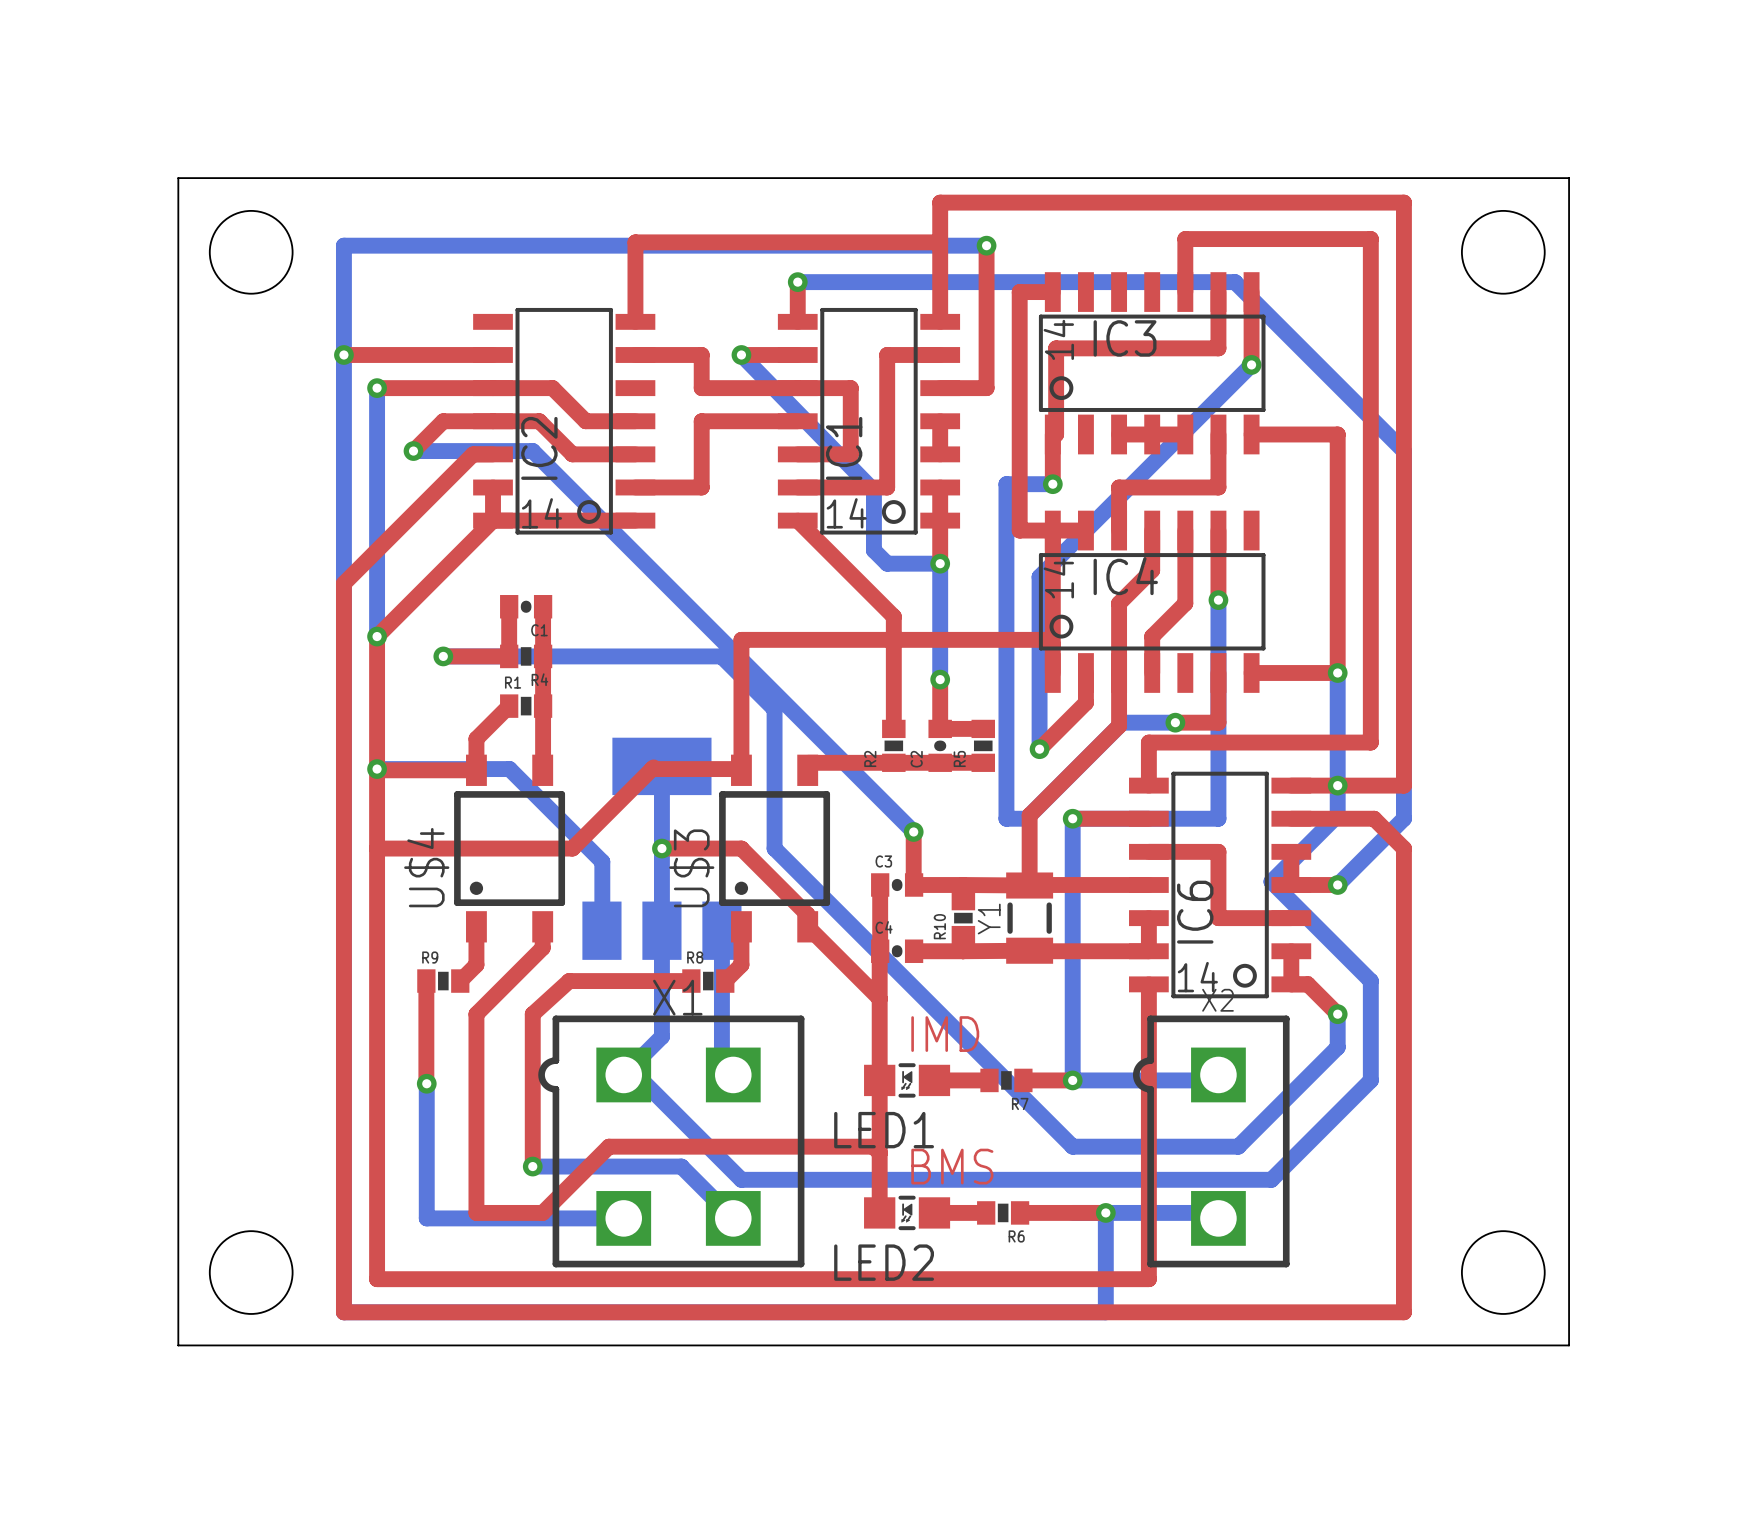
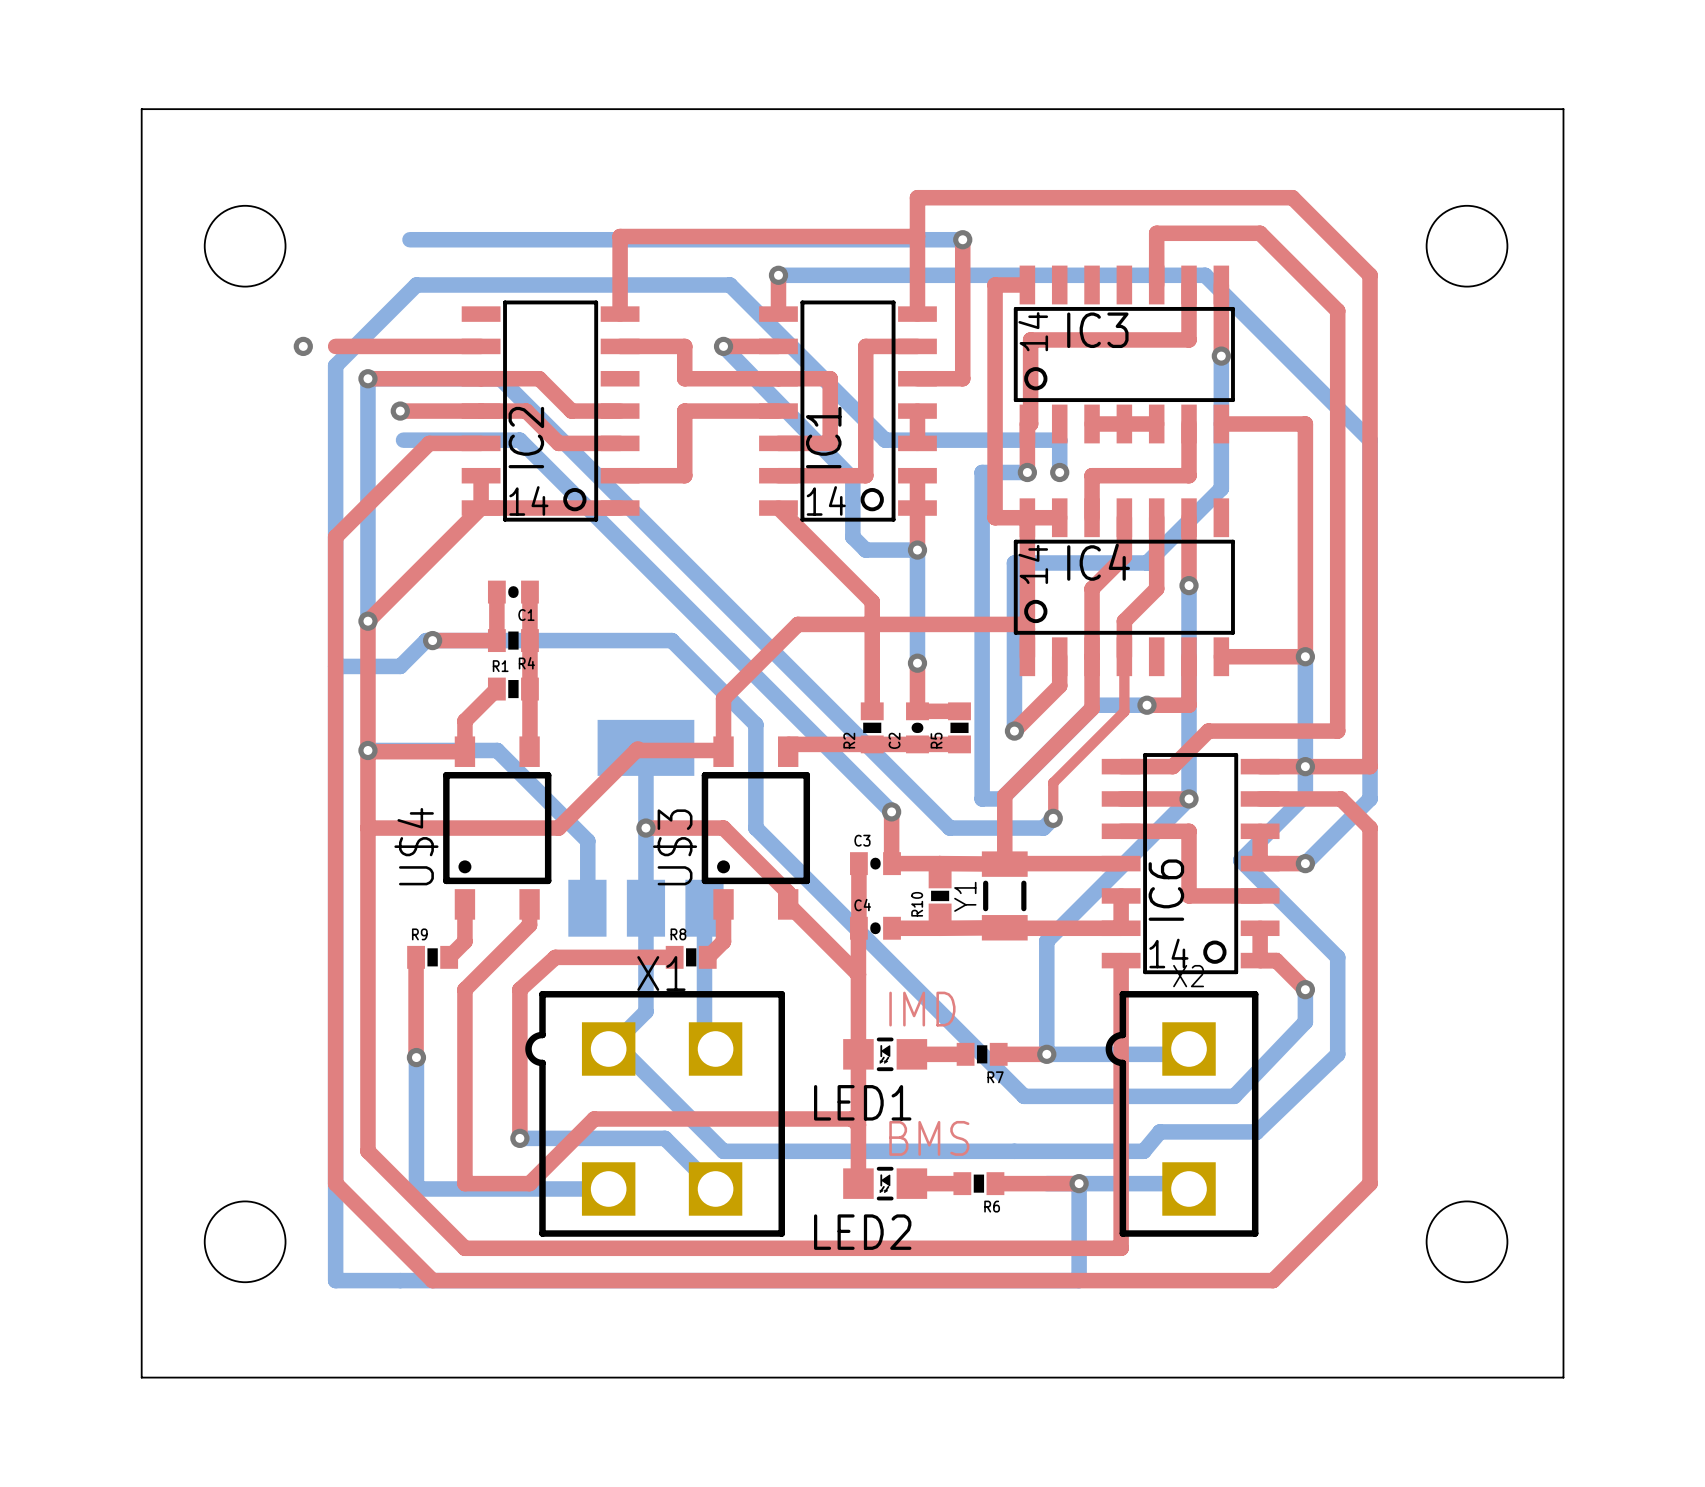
board edge: (178, 178) (1569, 178) (1569, 1345) (178, 1345) (178, 178) -> (141, 109) (141, 1377) (1563, 1377) (1563, 109) (141, 109)
top track: (1324, 202) (1403, 202) (1403, 282) -> (1292, 197) (1370, 275)
top track: (1291, 239) (1370, 239) (1370, 318) -> (1260, 233) (1337, 310)
bottom track: (420, 245) (343, 245) (343, 374) -> (1059, 472) (1059, 440) (885, 440) (730, 285) (416, 285) (335, 365)
via position: (343, 354) -> (303, 346)
bottom track: (1251, 364) (1039, 576) -> (1221, 356) (1221, 488) (1146, 562) (1014, 562)
bottom track: none -> (367, 378) (500, 378) (949, 828) (1043, 828) (1053, 818)
top track: (443, 421) (413, 451) -> (432, 411) (400, 411)
via position: (413, 451) -> (400, 411)
top track: (473, 454) (343, 583) -> (461, 443) (429, 443) (335, 537) (335, 569)
via: none -> (1059, 472)
top track: (817, 639) (741, 639) (741, 716) -> (797, 624) (723, 698)
bottom track: none -> (432, 640) (426, 640) (400, 666) (335, 666)
bottom track: (688, 656) (721, 656) (774, 709) (774, 742) -> (671, 640) (755, 724)
top track: none -> (1124, 656) (1124, 711) (1053, 782) (1053, 818)
top track: (1370, 742) (1148, 742) (1148, 785) -> (1337, 724) (1337, 731) (1208, 731) (1172, 766) (1121, 766)
top track: (1072, 818) (1148, 818) -> (1189, 798) (1121, 798)
via position: (1072, 818) -> (1053, 818)
bottom track: (1218, 818) (1072, 818) (1072, 964) -> (1189, 798) (1046, 941)
via: none -> (1189, 798)
bottom track: (1337, 1047) (1238, 1146) (1072, 1146) (1049, 1123) -> (1305, 1022) (1234, 1096) (1024, 1096)
bottom track: (1370, 1080) (1271, 1179) (1172, 1179) -> (1337, 1054) (1256, 1132) (1159, 1131) (1143, 1151)
top track: (377, 1179) (377, 1279) (476, 1279) -> (367, 1151) (464, 1248)
top track: (343, 1212) (343, 1312) (443, 1312) -> (335, 1183) (432, 1280)
top track: (1403, 1212) (1403, 1312) (1304, 1312) -> (1370, 1183) (1273, 1280)

